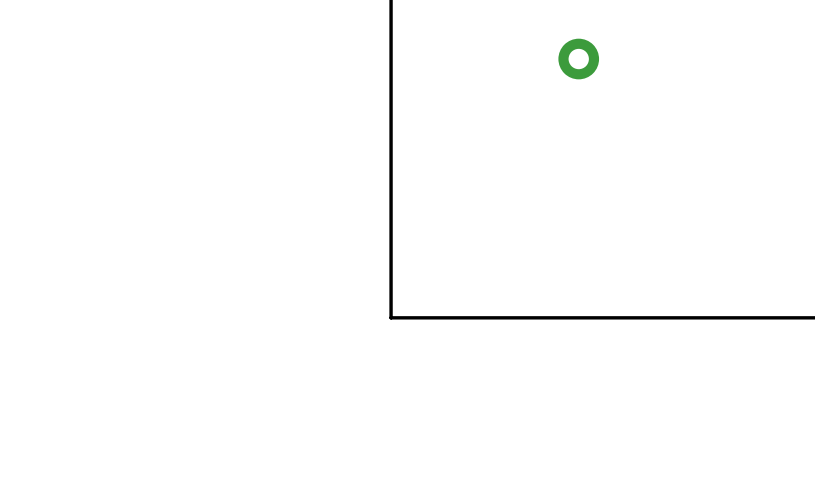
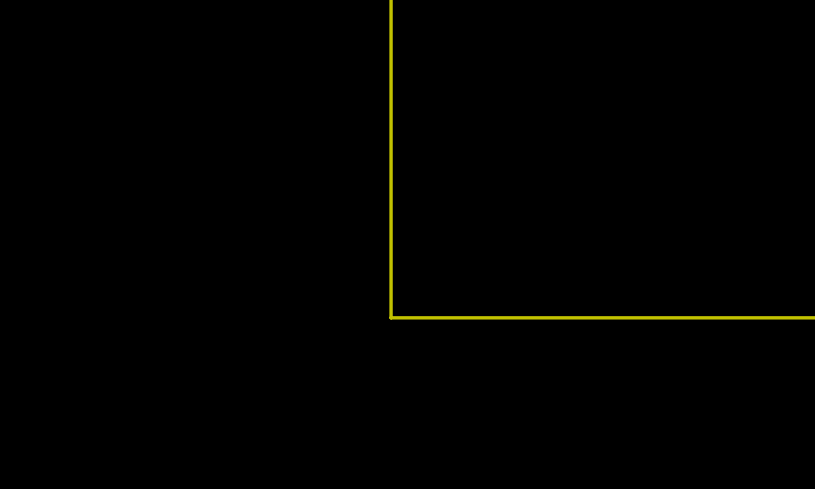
via: (578, 59) -> none

